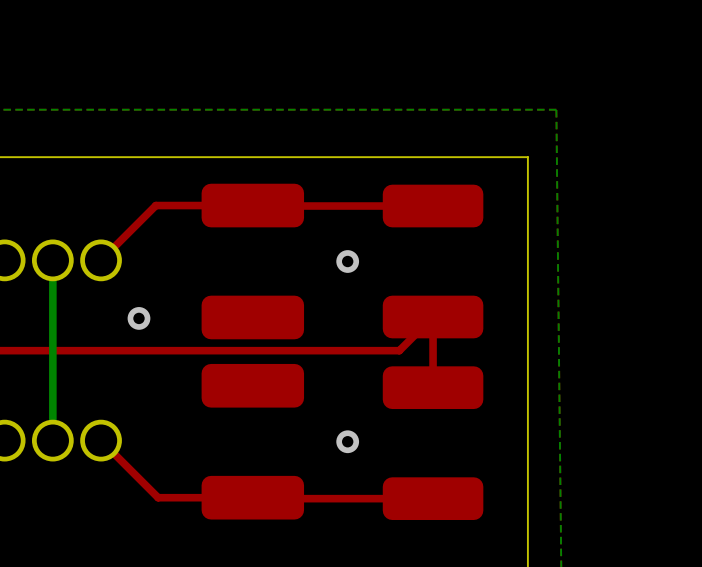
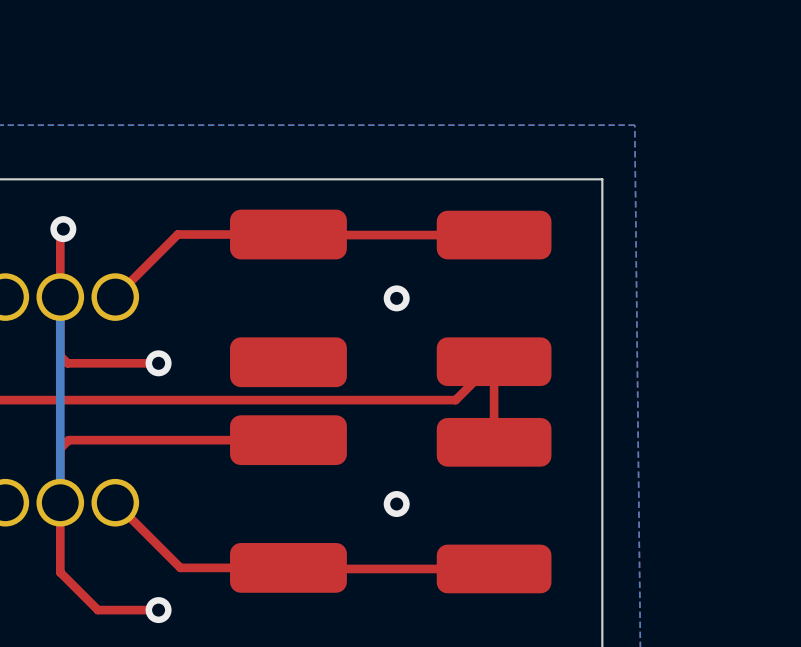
top track: none -> (63, 229) (60, 232) (60, 355) (67, 363) (158, 363)
via: none -> (63, 229)
top track: none -> (288, 440) (68, 440) (60, 448) (60, 572) (97, 610) (158, 610)
via: none -> (158, 610)

